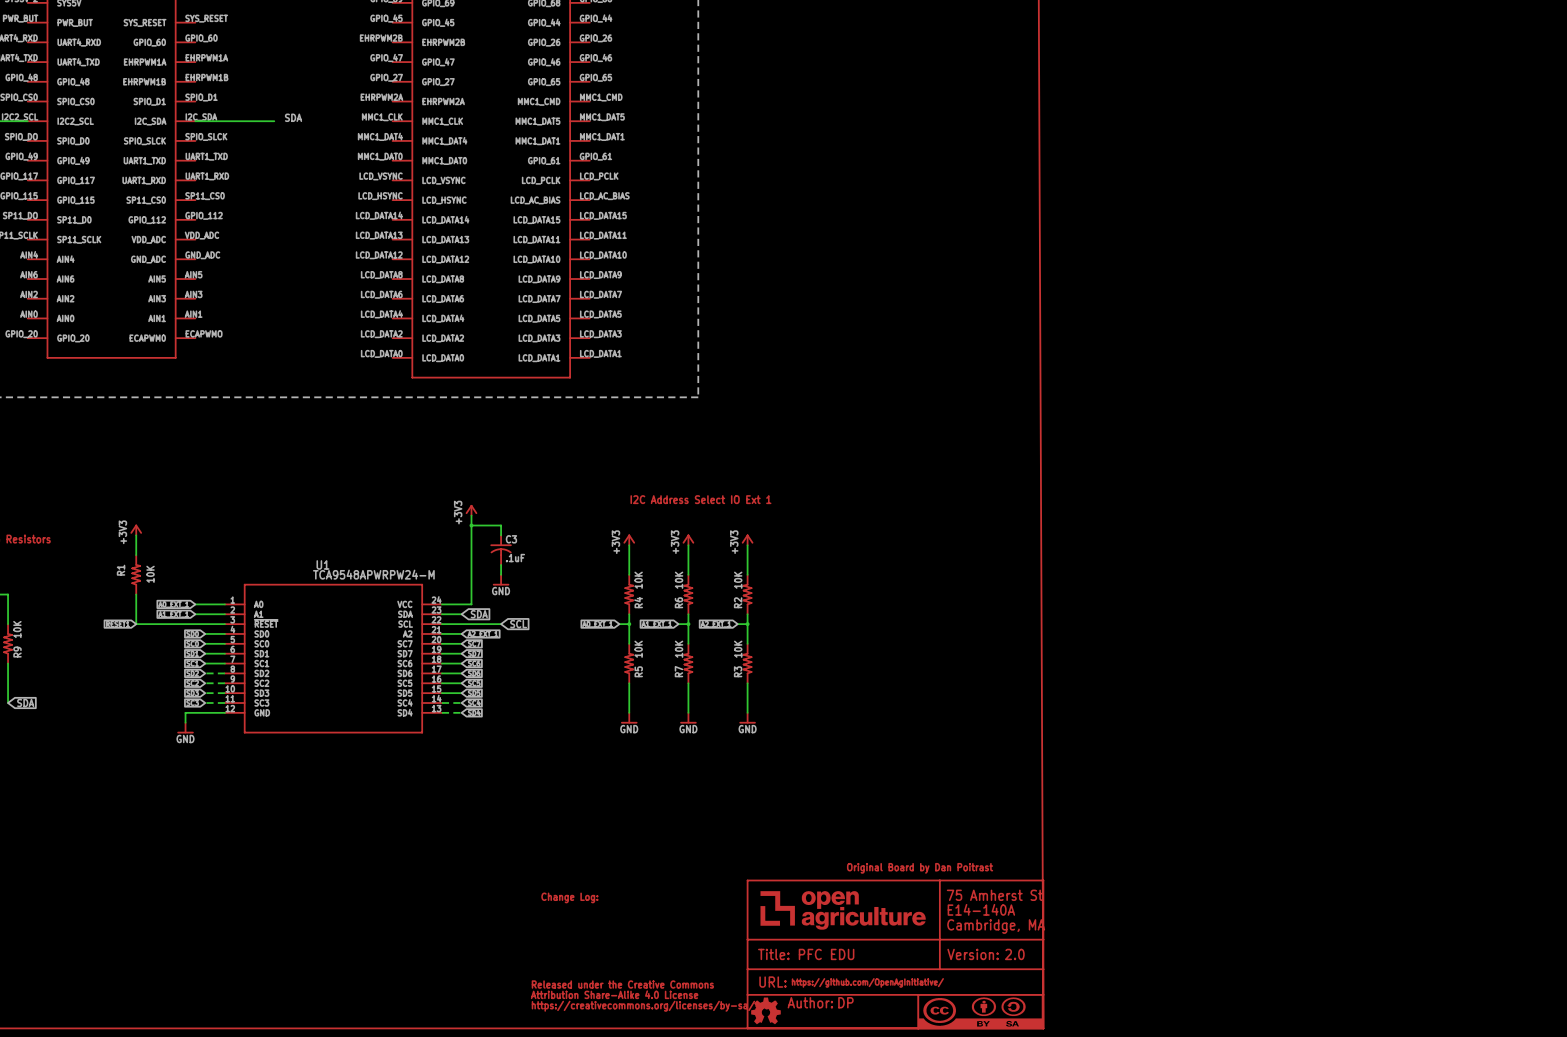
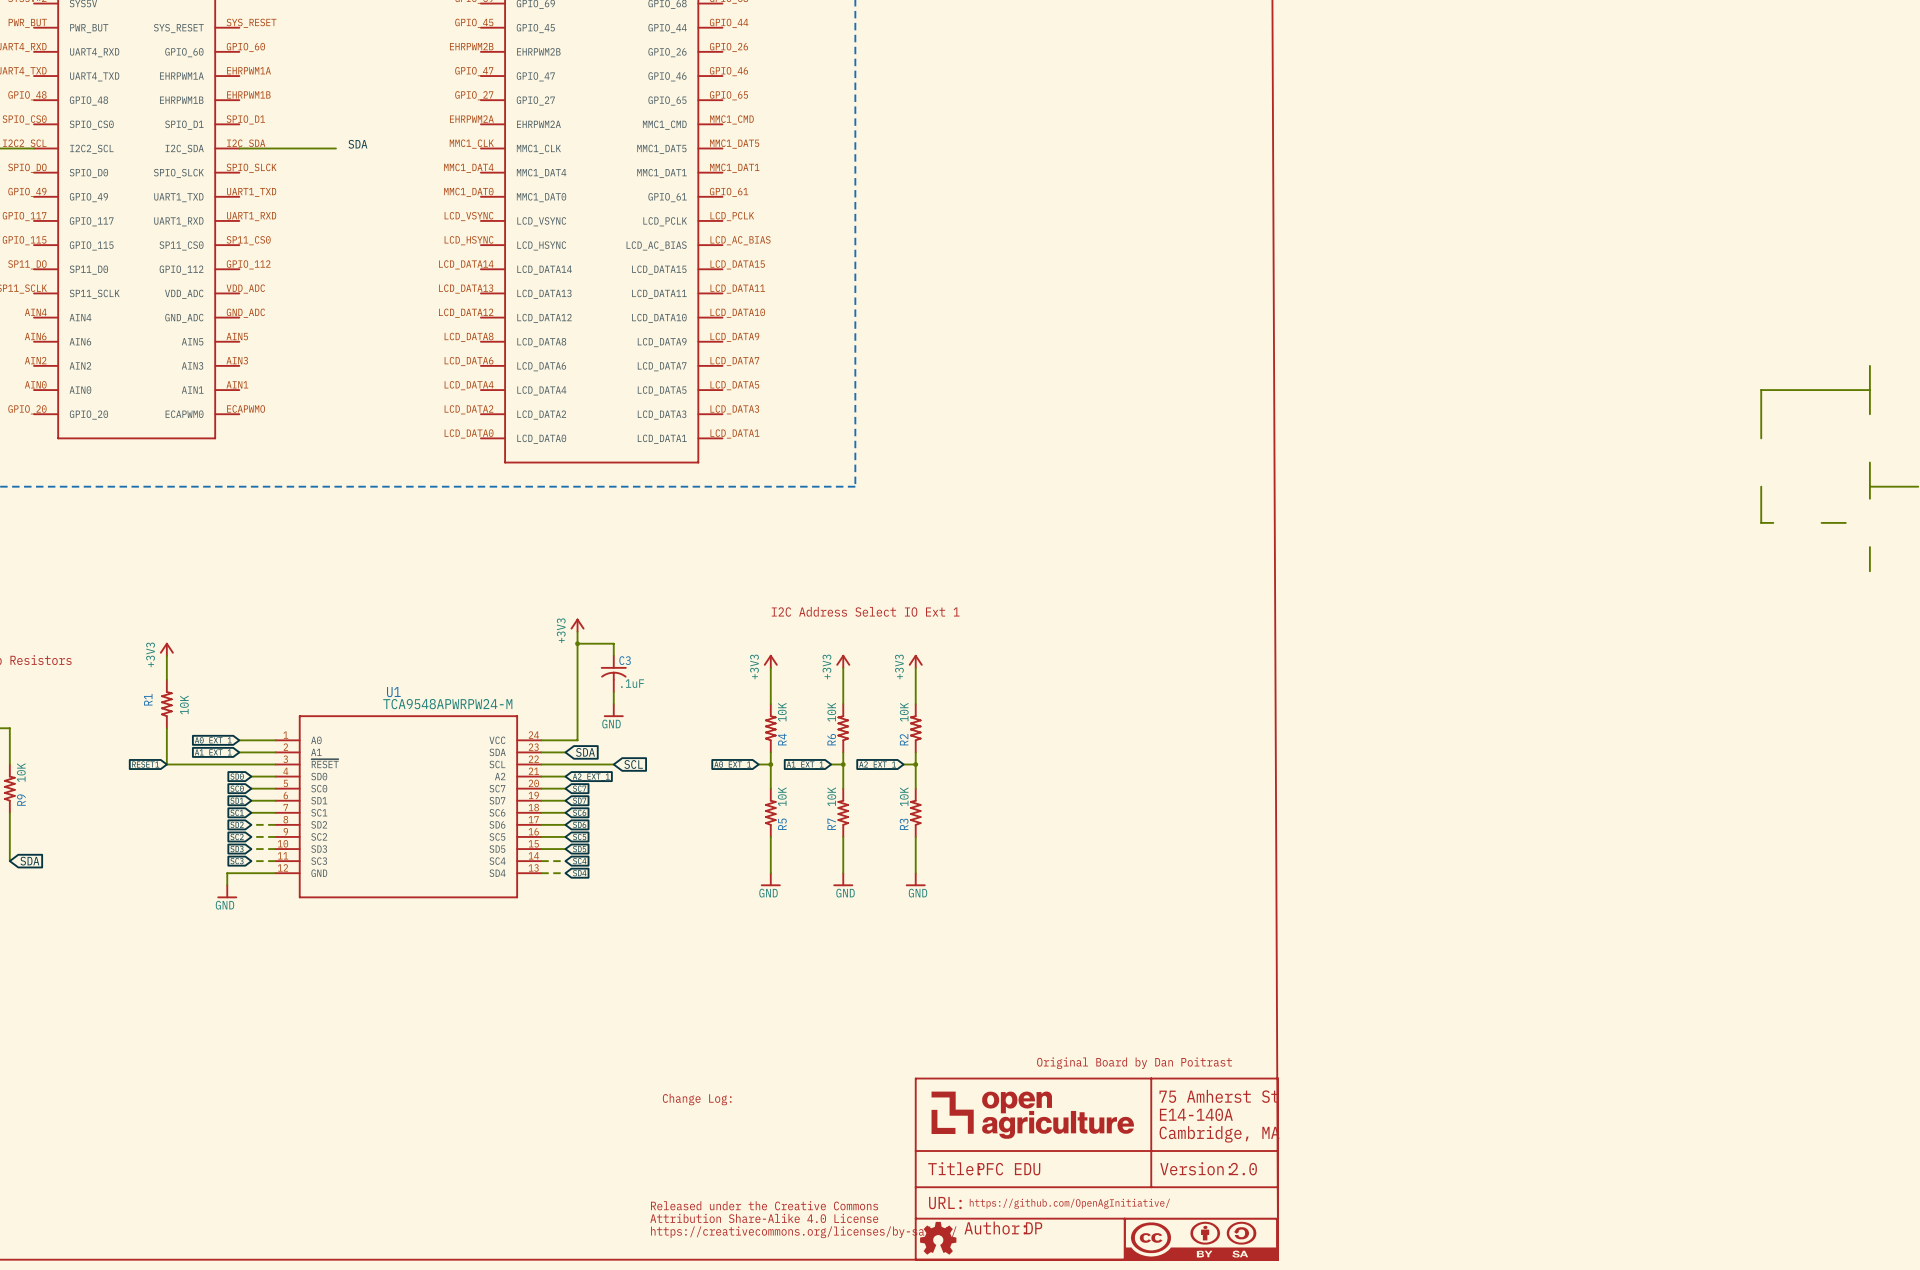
wire: none -> (1869, 365) (1869, 414)
wire: none -> (1869, 390) (1761, 390) (1761, 438)
wire: none -> (1869, 462) (1869, 498)
wire: none -> (1761, 486) (1761, 522) (1773, 522)
wire: none -> (1869, 486) (1918, 486)
wire: none -> (1821, 522) (1845, 522)
wire: none -> (1869, 547) (1869, 571)

